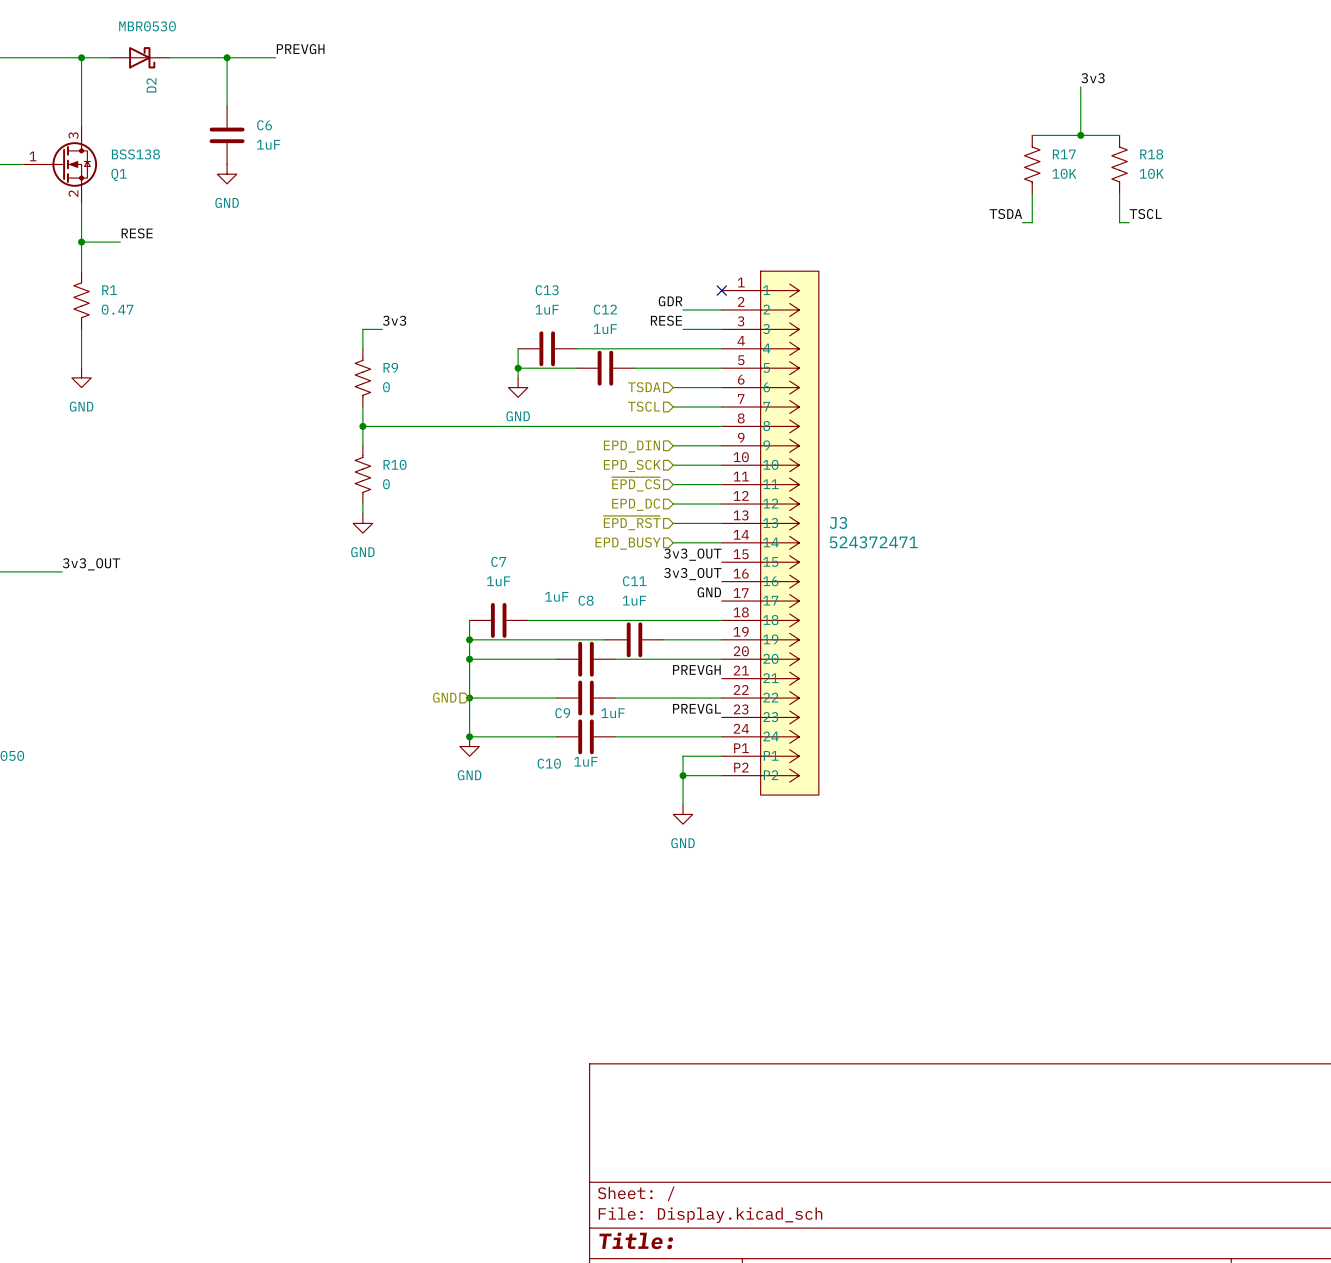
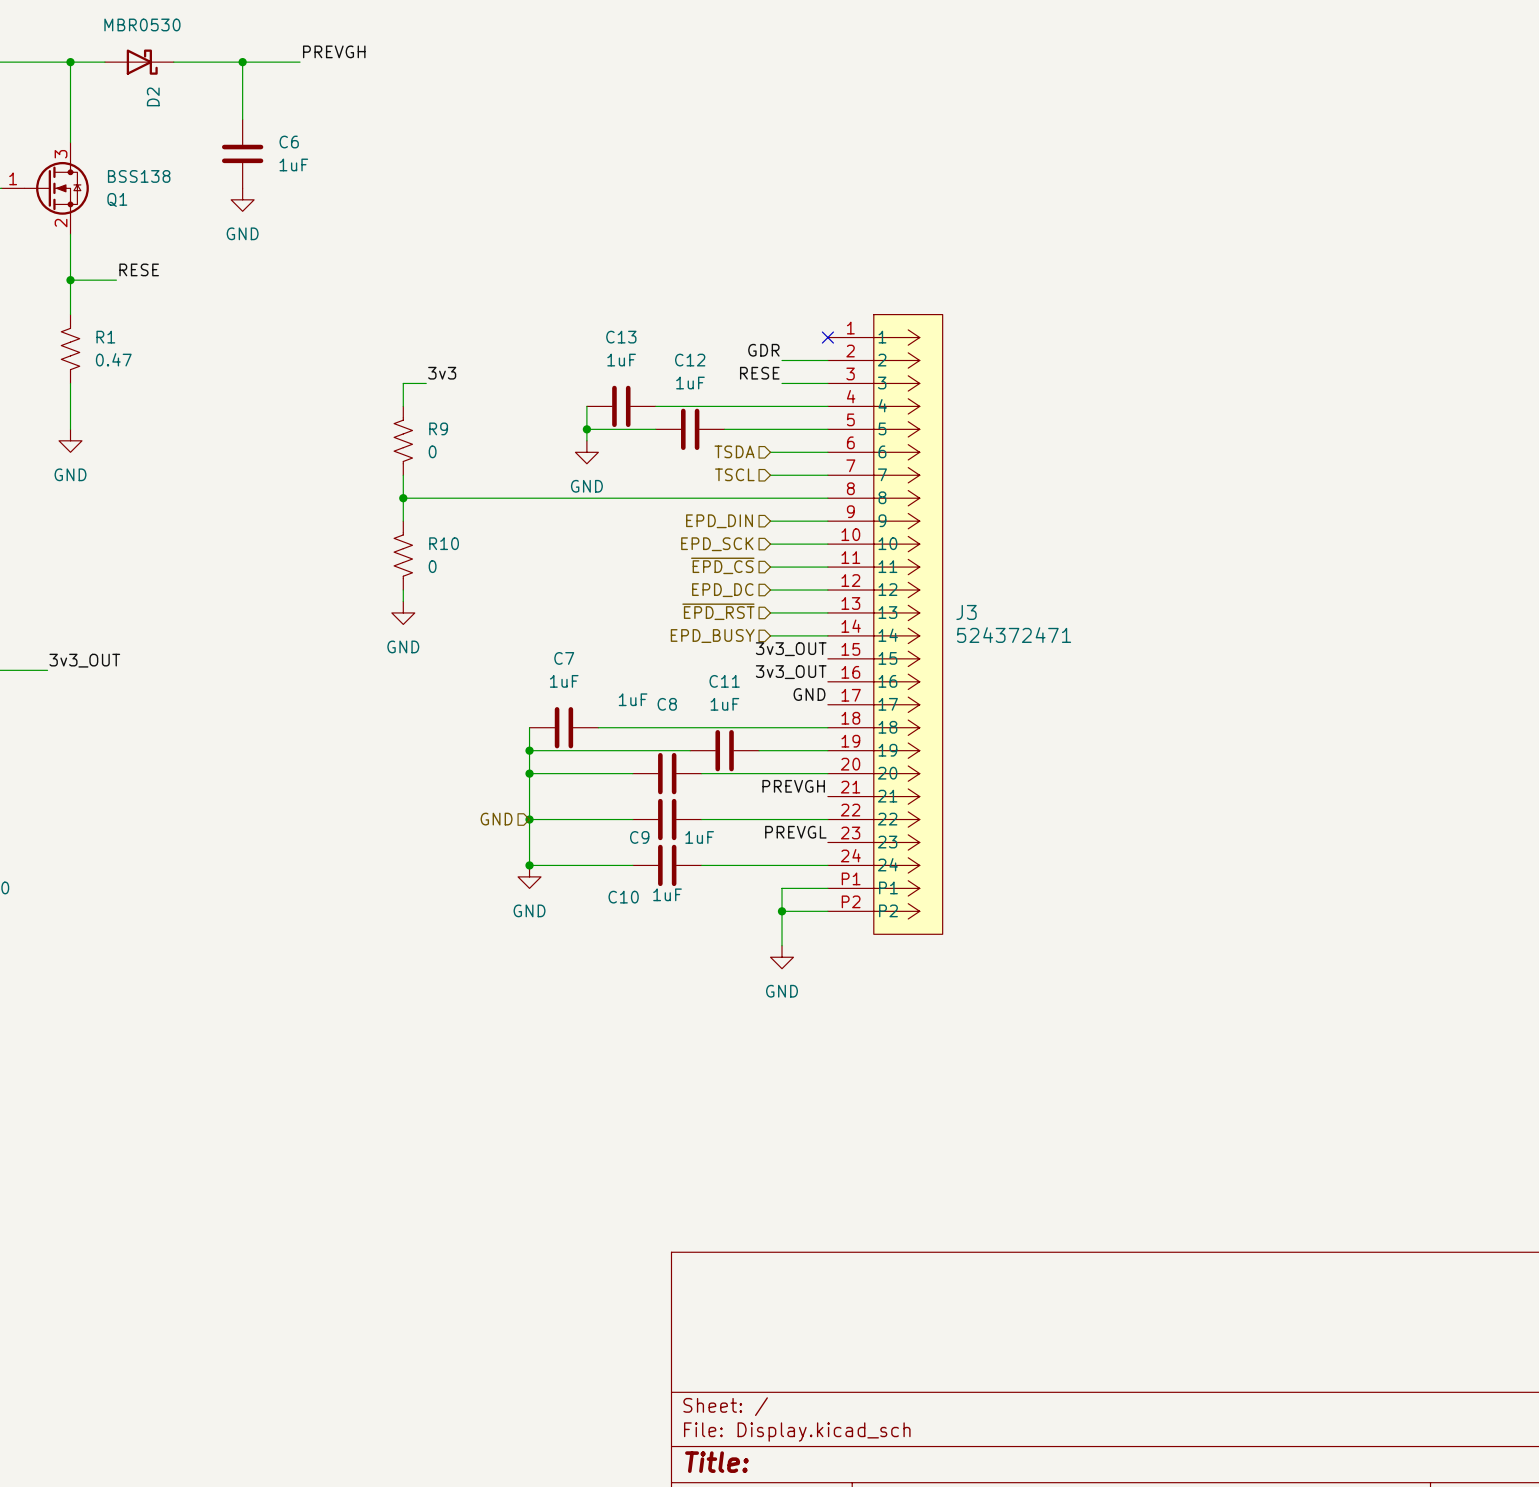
label: 3v3 (1093, 78) -> none
wire: (1080, 86) (1080, 135) -> none
wire: (1032, 135) (1119, 135) -> none
junction: (1080, 135) -> none
R17: 10K (1032, 164) -> none
R18: 10K (1119, 164) -> none
wire: (1032, 193) (1032, 222) (1022, 222) -> none
wire: (1119, 193) (1119, 222) (1129, 222) -> none
label: TSDA (1005, 214) -> none
label: TSCL (1145, 214) -> none

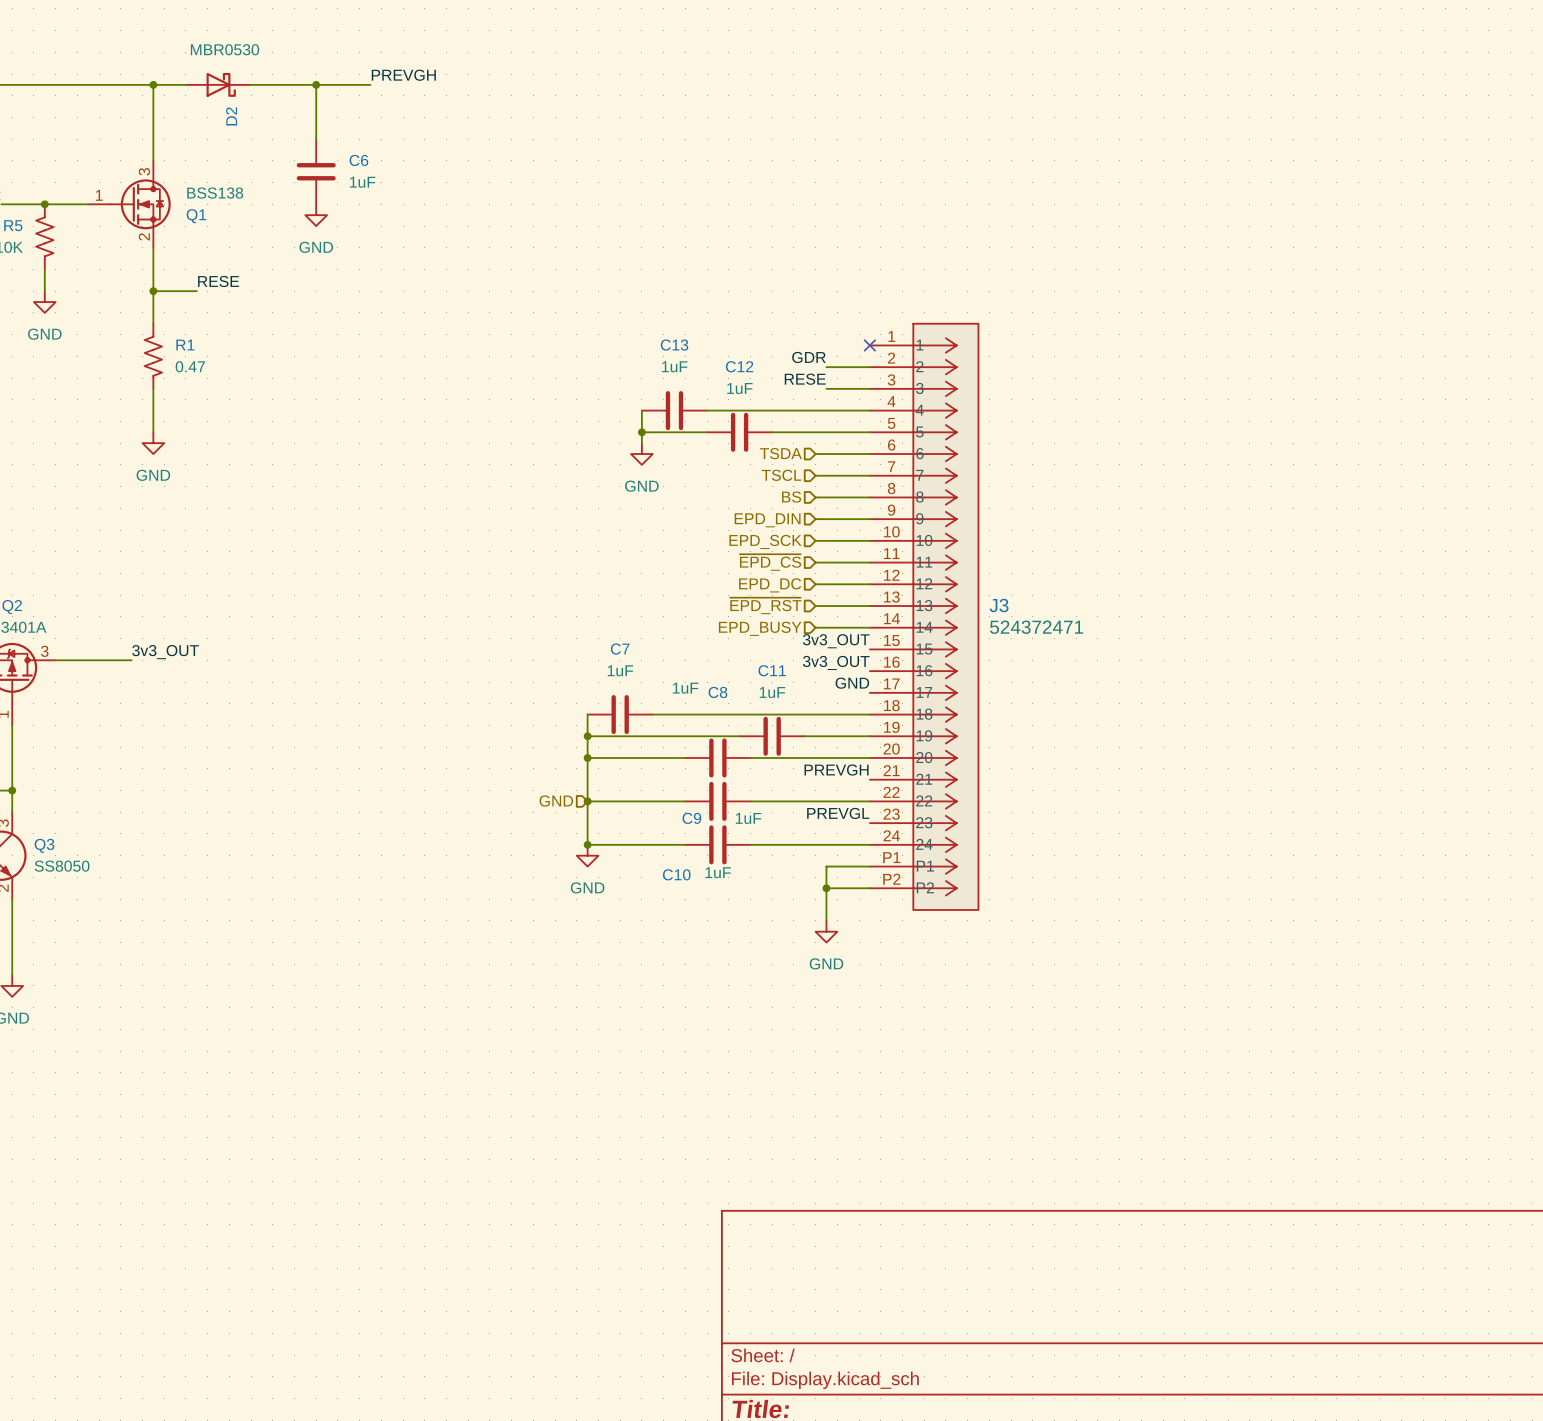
label: 3v3 (442, 373) -> none
wire: (426, 383) (403, 383) (403, 406) -> none
R9: 0 (403, 440) -> none
wire: (403, 475) (403, 521) -> none
hierarchical label: none -> BS (791, 497)
wire: (403, 498) (770, 498) -> none
junction: (403, 498) -> none
R10: 0 (403, 555) -> none
wire: (403, 590) (403, 601) -> none
power symbol: GND (403, 612) -> none

